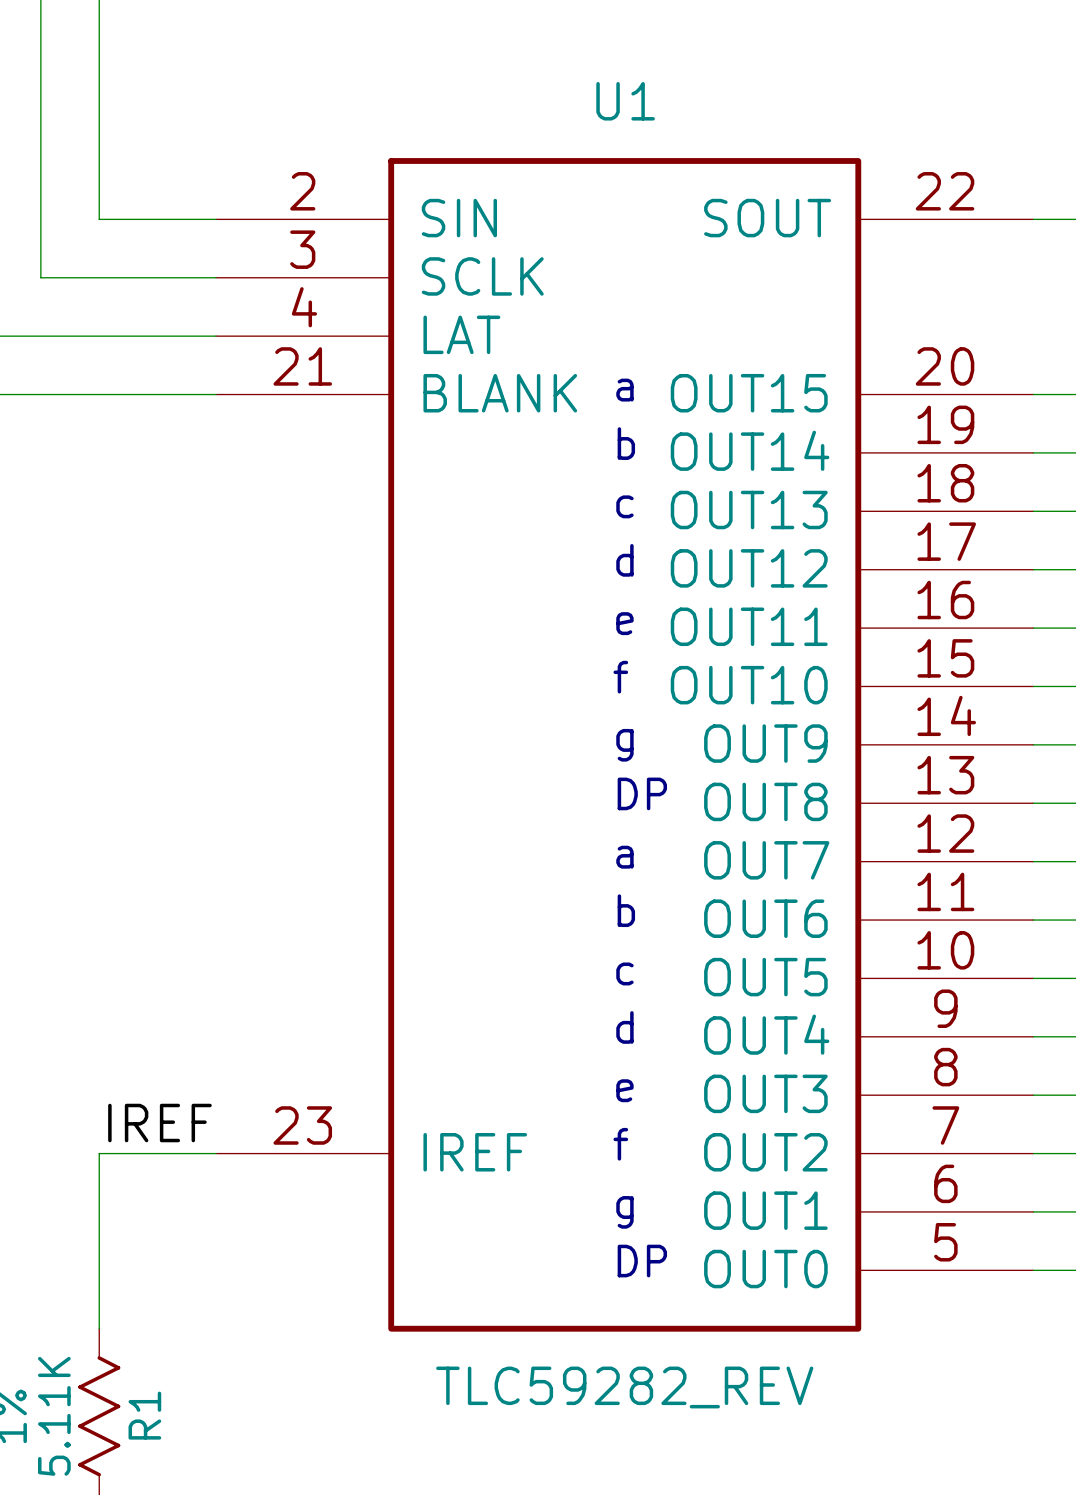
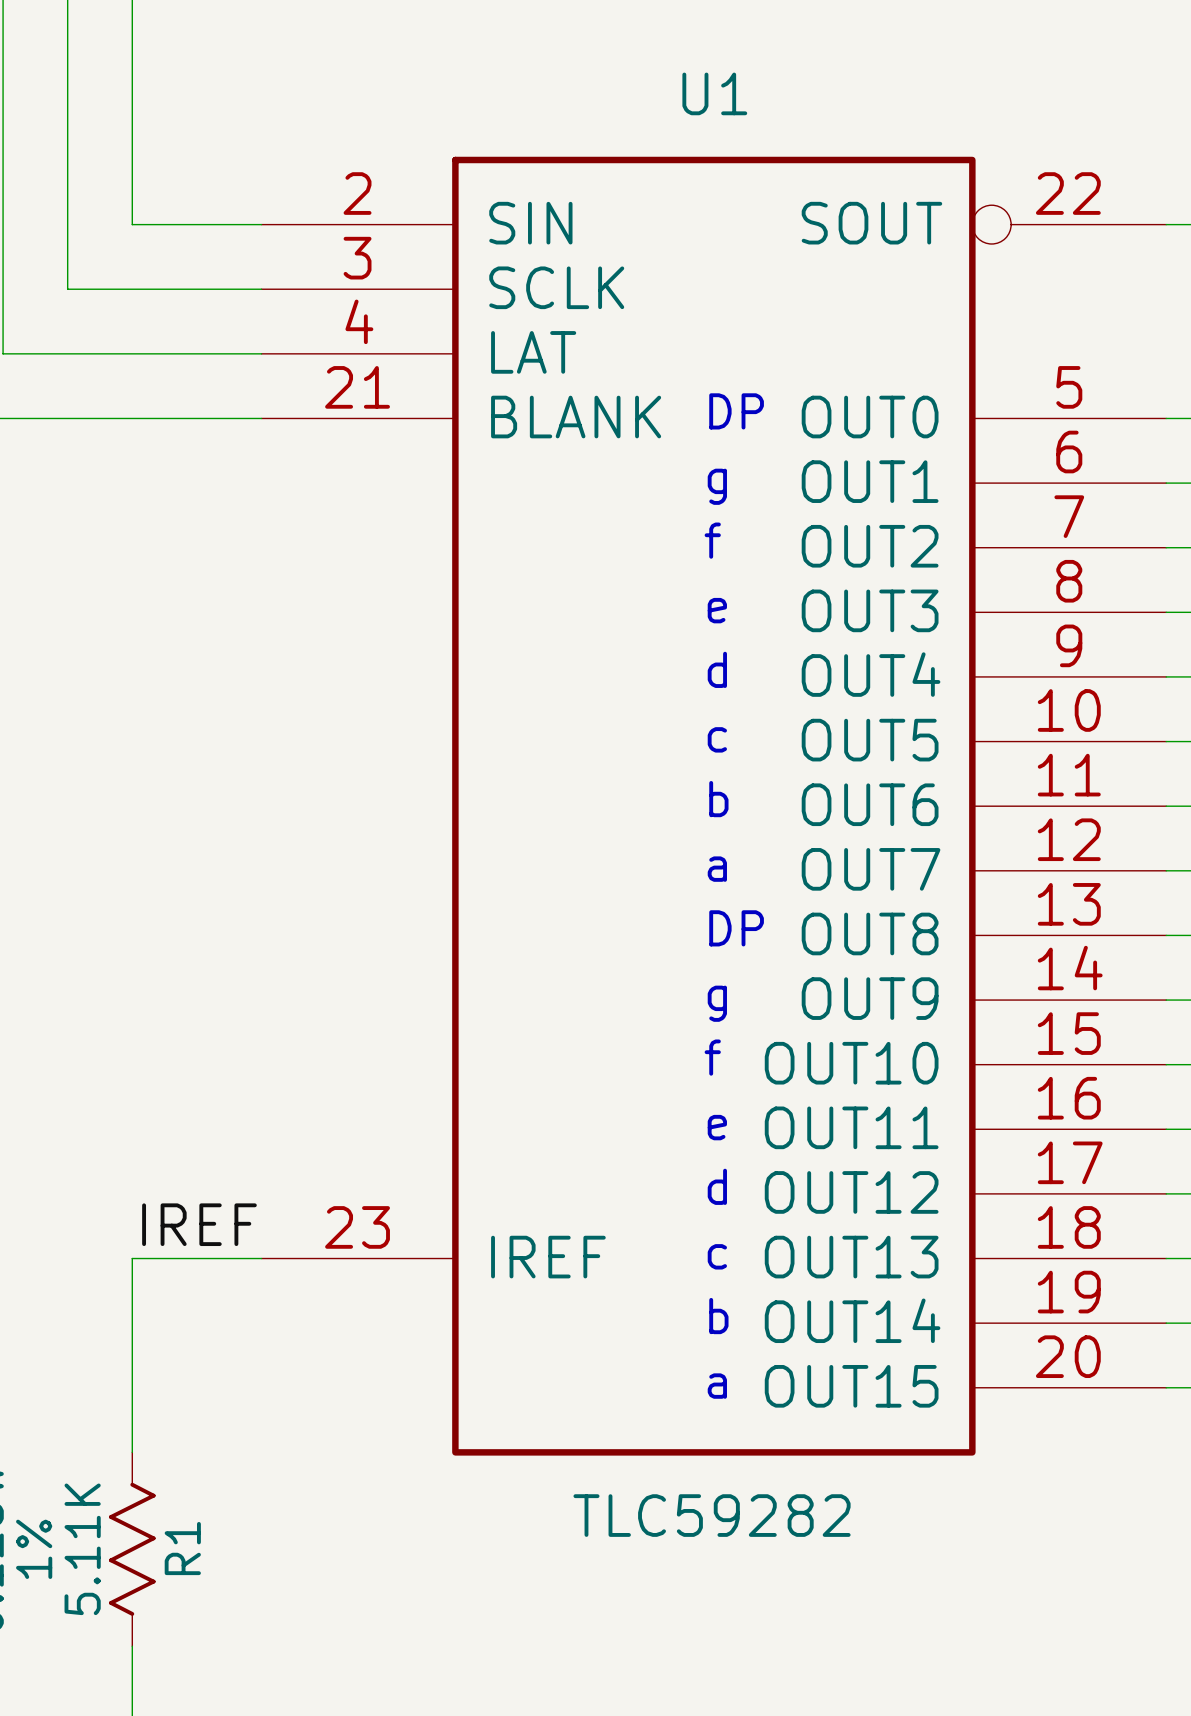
U1 symbol: [216, 158, 1034, 1332] -> [261, 156, 1167, 1456]
text: a (624, 390) -> DP (736, 411)
text: b (626, 443) -> g (717, 486)
text: c (624, 506) -> f (712, 540)
text position: d (624, 560) -> d (717, 669)
text position: e (624, 623) -> e (717, 610)
text: f (620, 677) -> c (717, 739)
text: g (624, 745) -> b (718, 799)
text position: DP (642, 793) -> DP (736, 928)
text position: a (624, 857) -> a (717, 869)
text: b (626, 910) -> g (717, 1003)
text: c (624, 973) -> f (712, 1057)
text position: d (624, 1027) -> d (717, 1186)
text position: e (624, 1090) -> e (717, 1127)
text: f (620, 1144) -> c (717, 1256)
text: g (624, 1212) -> b (718, 1316)
text: DP (642, 1261) -> a (717, 1386)
U1 value: TLC59282_REV (624, 1387) -> TLC59282 (712, 1515)

